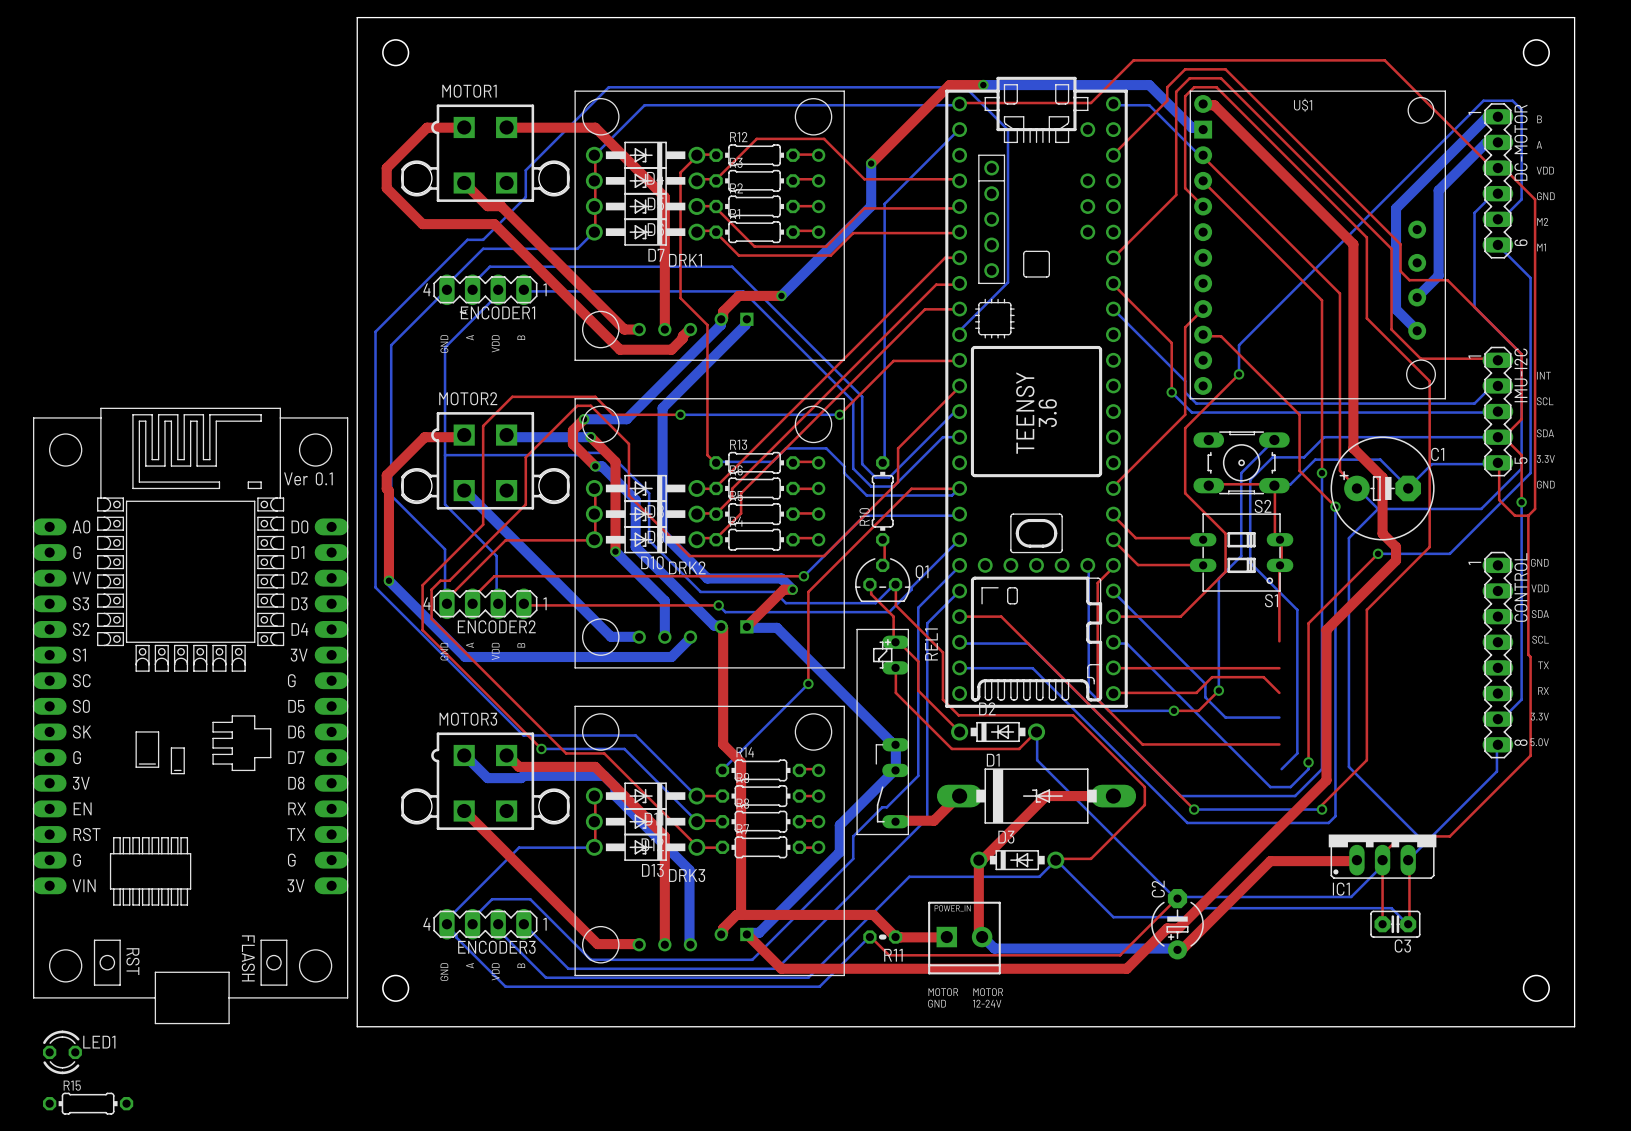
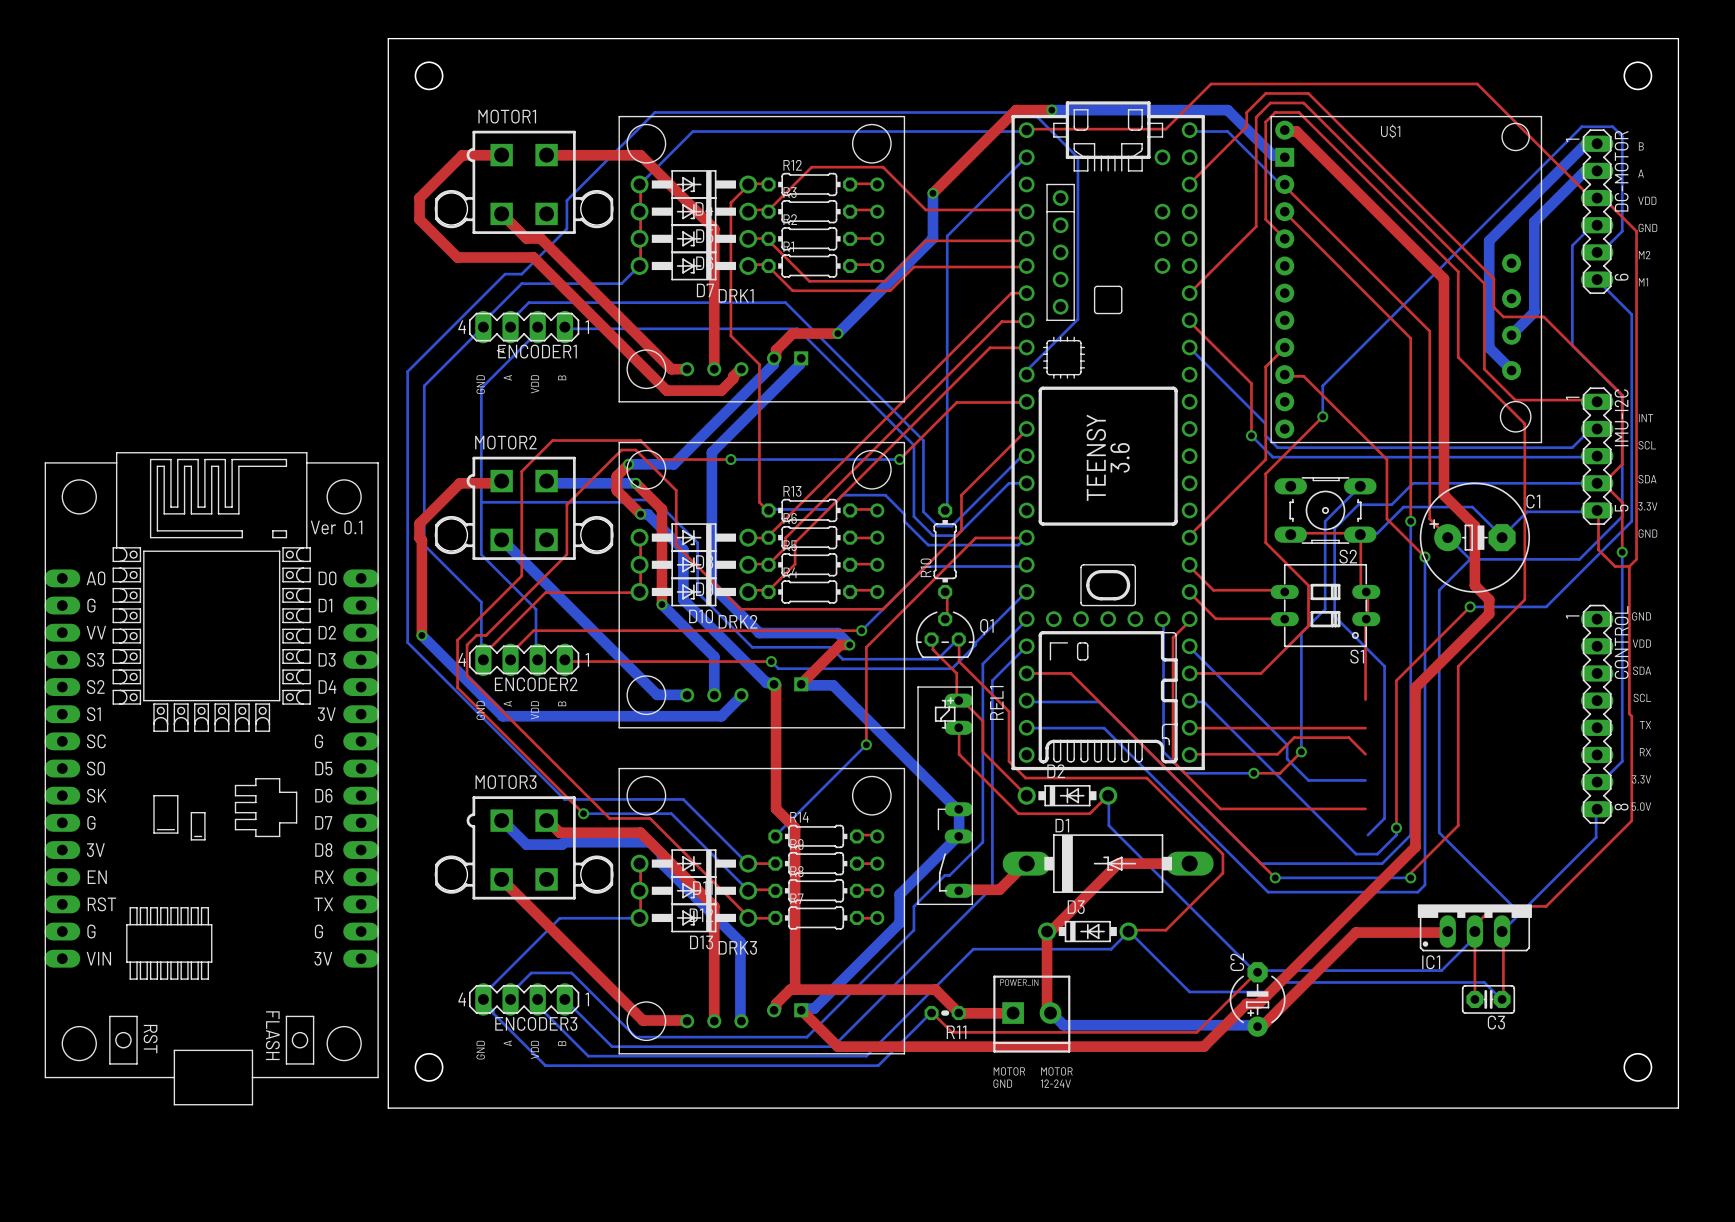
LED1: (62, 1052) -> none
R15: (88, 1103) -> none

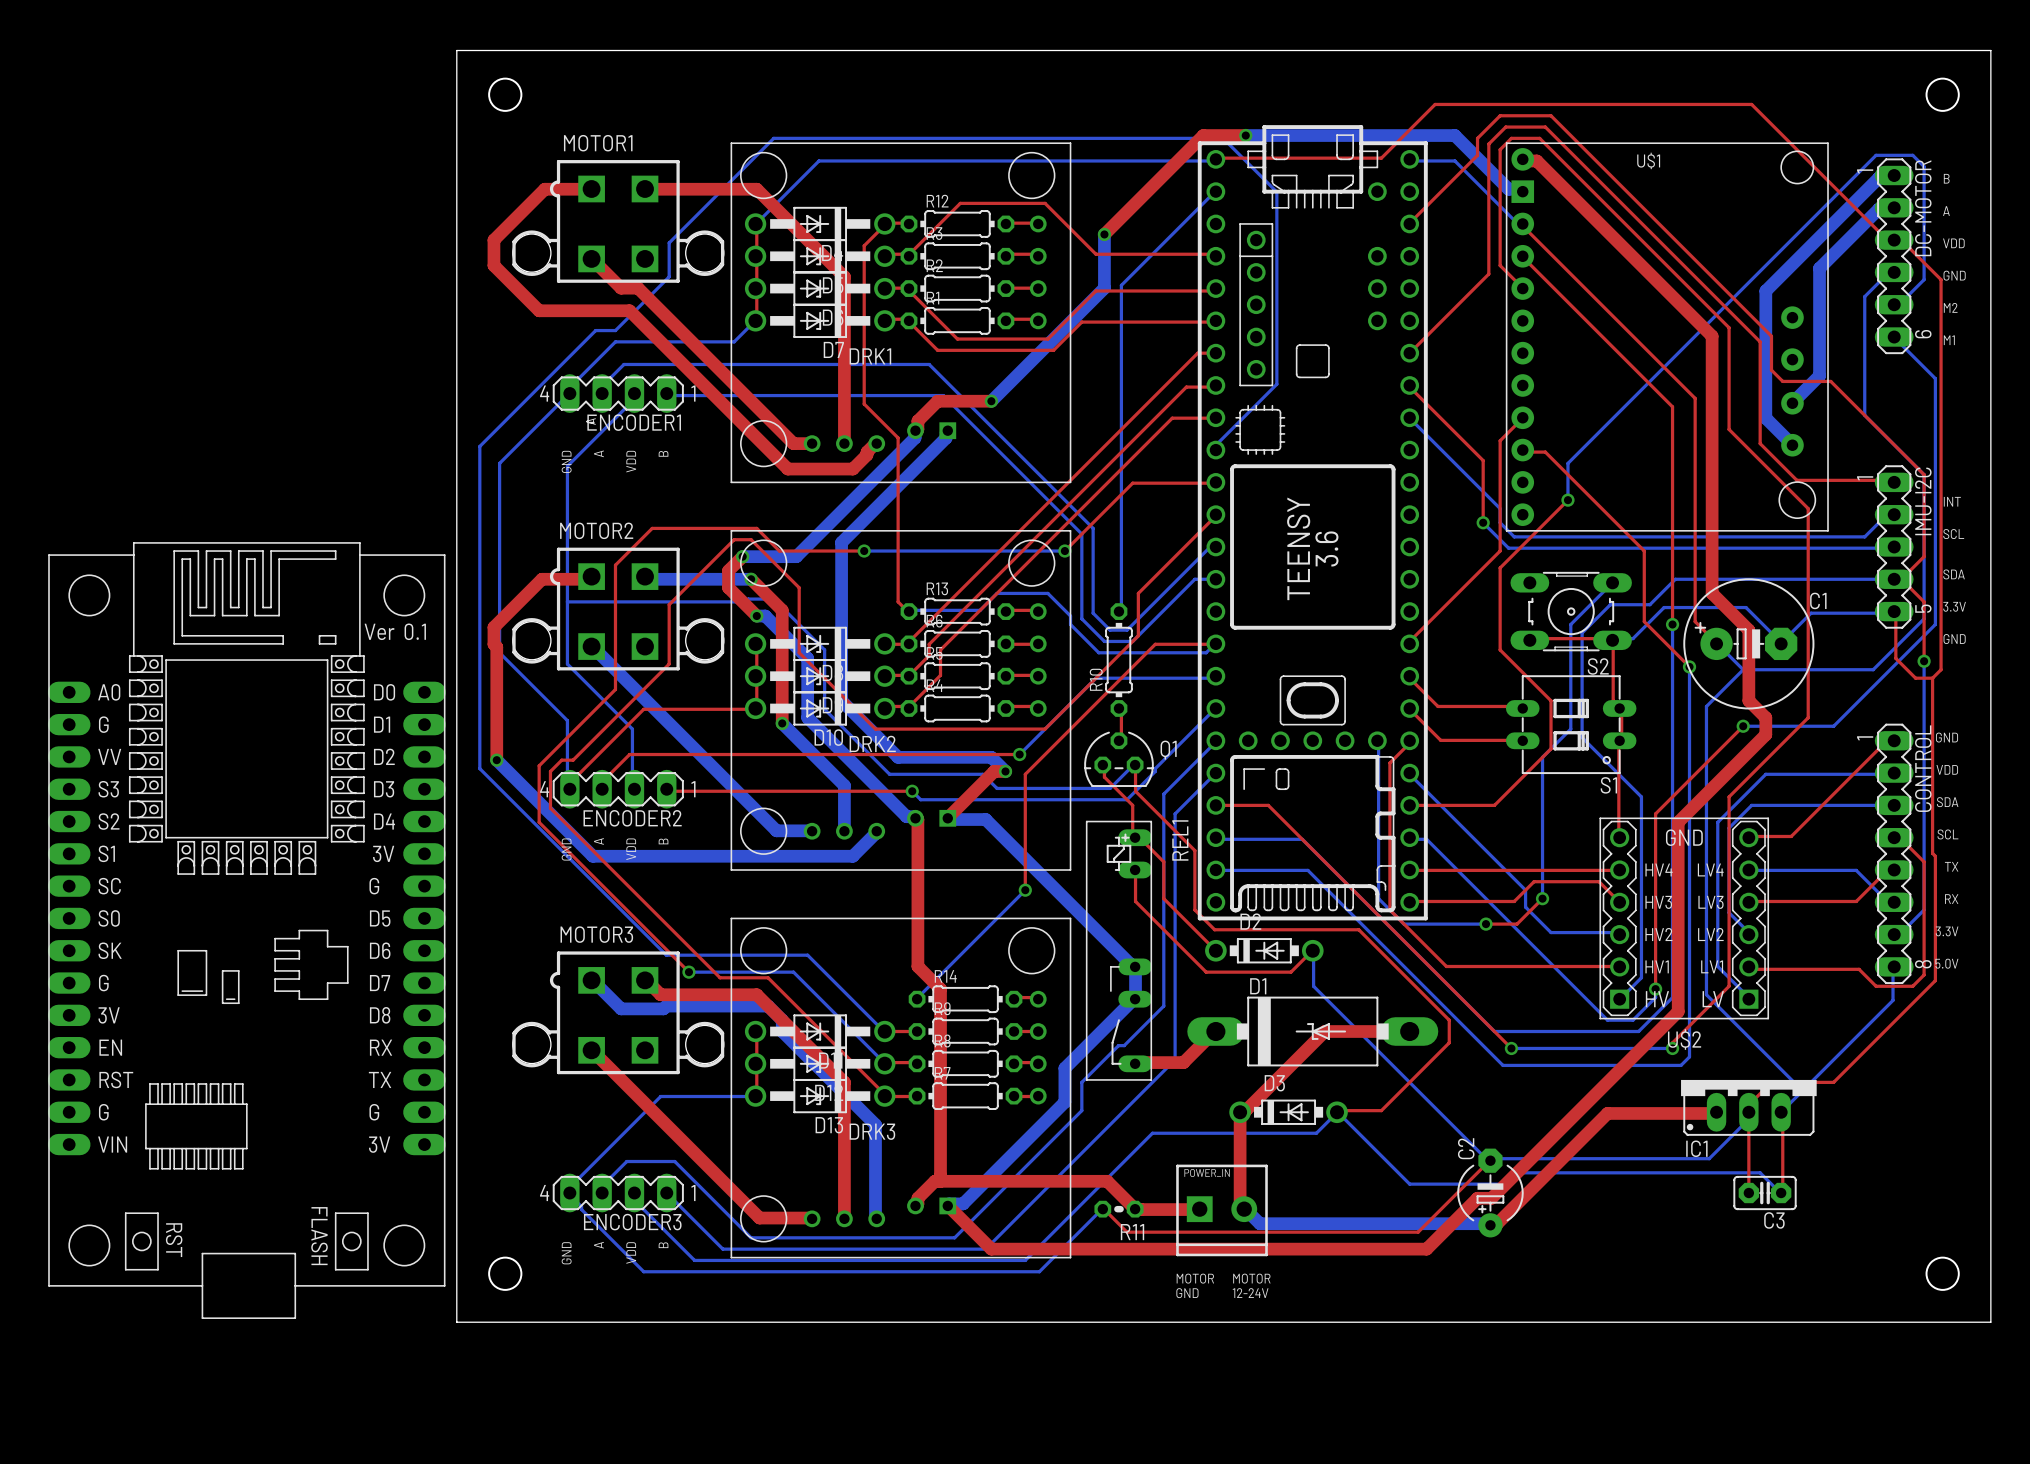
top track: none -> (1894, 740) (1893, 743) (1884, 743) (1791, 836) (1748, 837)
bottom track: none -> (1894, 773) (1765, 774) (1717, 822) (1717, 966) (1748, 999)
bottom track: none -> (1894, 805) (1751, 805) (1729, 828) (1729, 912) (1748, 934)
top track: none -> (1894, 837) (1901, 839) (1924, 861) (1924, 974) (1912, 986) (1876, 986) (1859, 969) (1748, 969) (1748, 966)
bottom track: none -> (1748, 869) (1856, 870) (1887, 901) (1894, 902)
top track: none -> (1894, 869) (1887, 870) (1856, 901) (1748, 902)
U$2: none -> (1684, 918)

